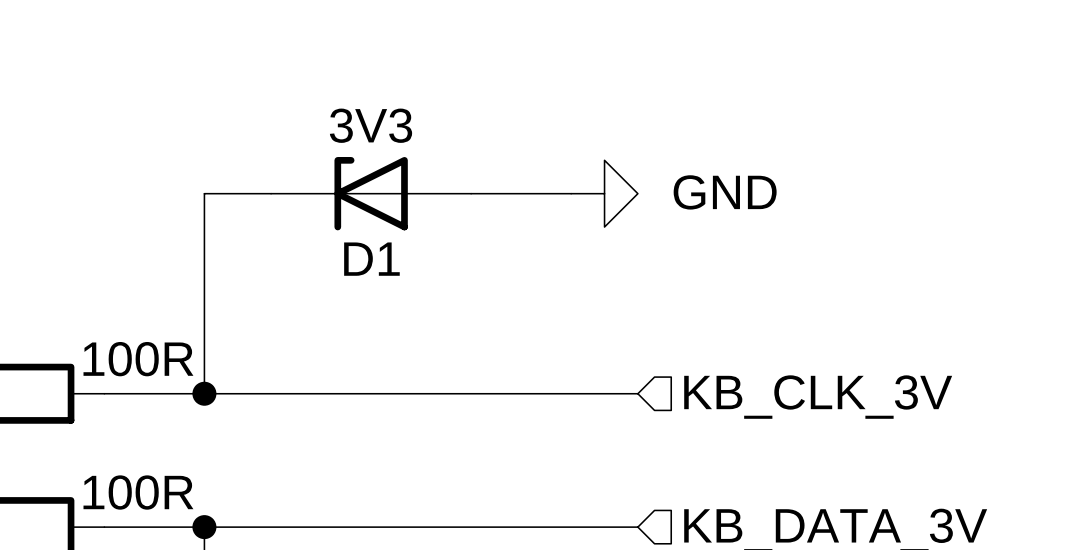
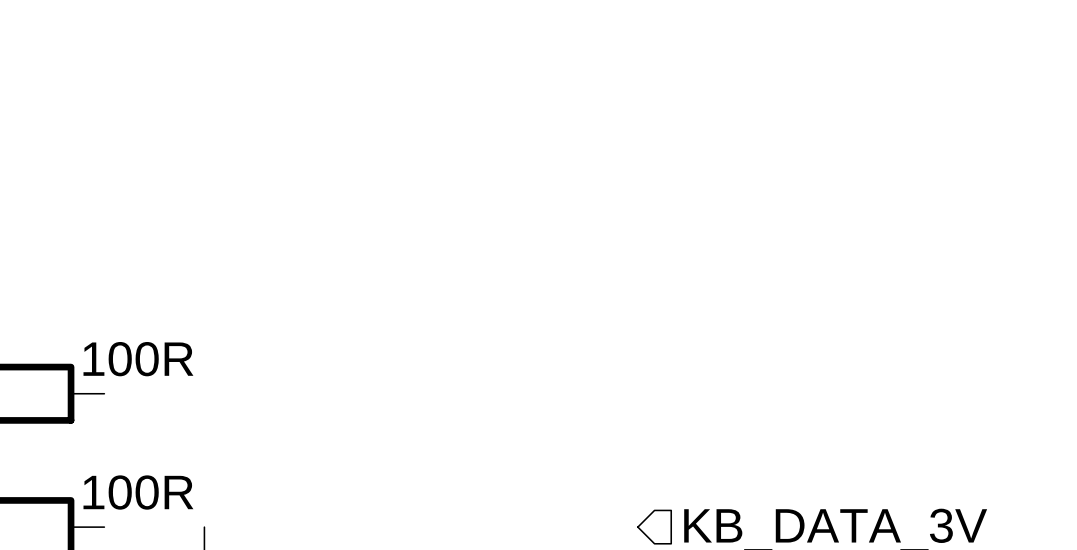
wire: (271, 193) (204, 193) (204, 393) -> none
D1: 3V3 (371, 193) -> none
wire: (471, 193) (571, 193) -> none
power symbol: GND (604, 193) -> none
wire: (104, 393) (637, 393) -> none
junction: (204, 393) -> none
hierarchical label: KB_CLK_3V (818, 397) -> none
wire: (104, 527) (637, 527) -> none
junction: (204, 527) -> none

